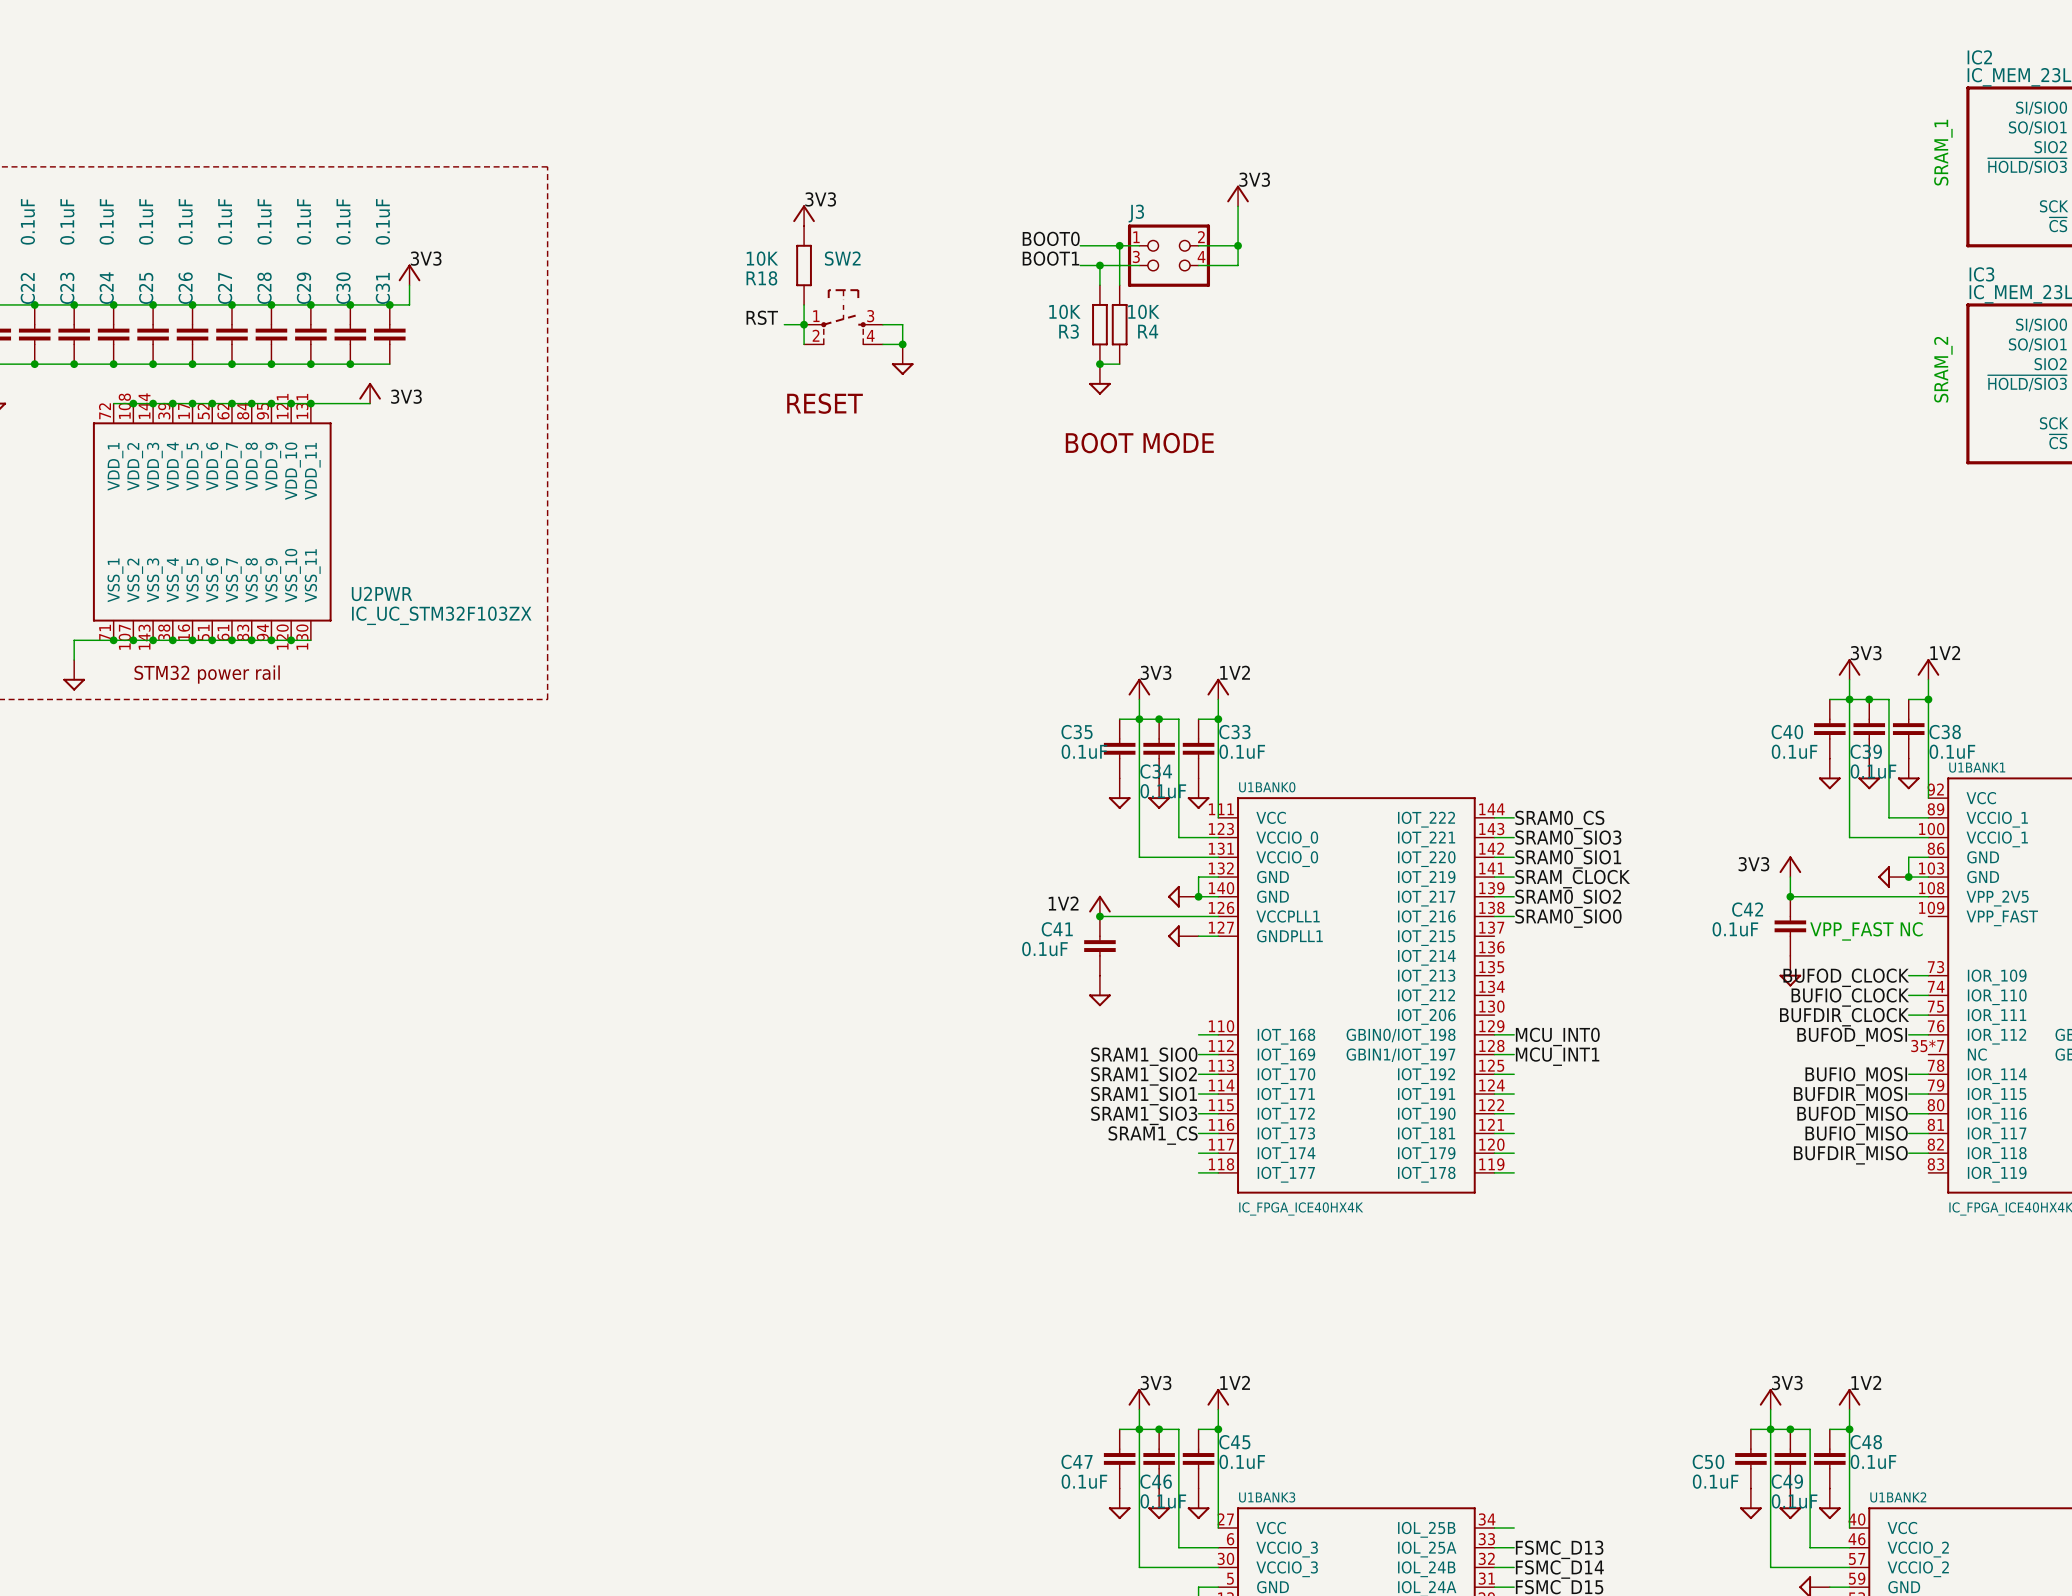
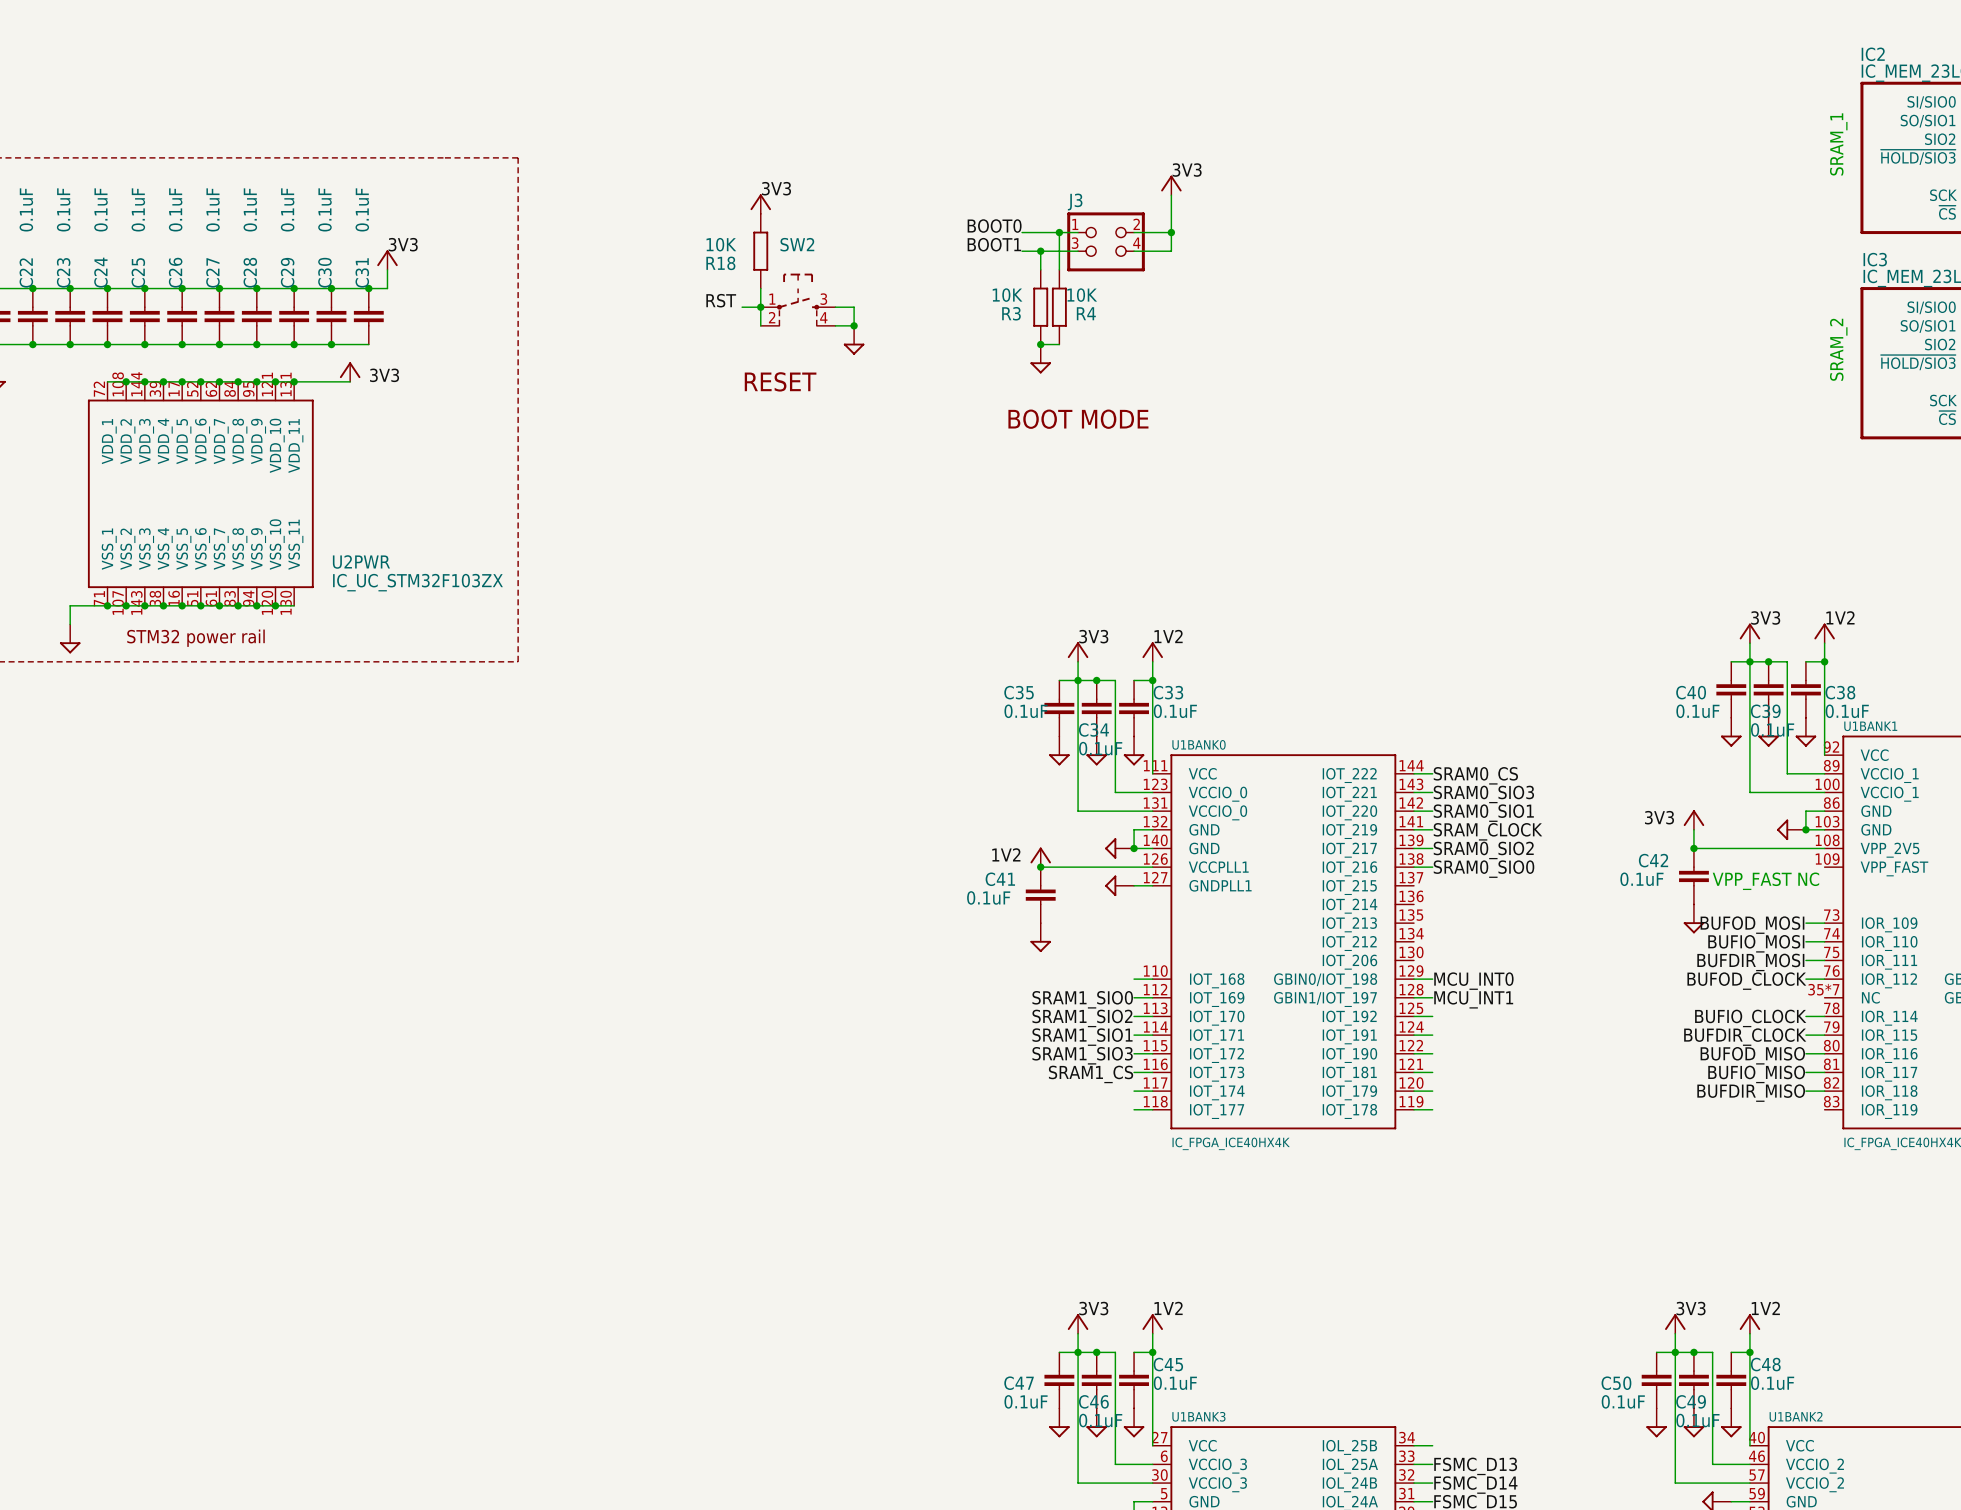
label: BUFOD_CLOCK (1846, 977) -> BUFOD_MOSI (1752, 925)
label: BUFIO_CLOCK (1850, 997) -> BUFIO_MOSI (1756, 943)
label: BUFDIR_CLOCK (1844, 1017) -> BUFDIR_MOSI (1750, 962)
label: BUFOD_MOSI (1852, 1036) -> BUFOD_CLOCK (1746, 981)
label: BUFIO_MOSI (1856, 1076) -> BUFIO_CLOCK (1750, 1018)
label: BUFDIR_MOSI (1850, 1096) -> BUFDIR_CLOCK (1745, 1037)

